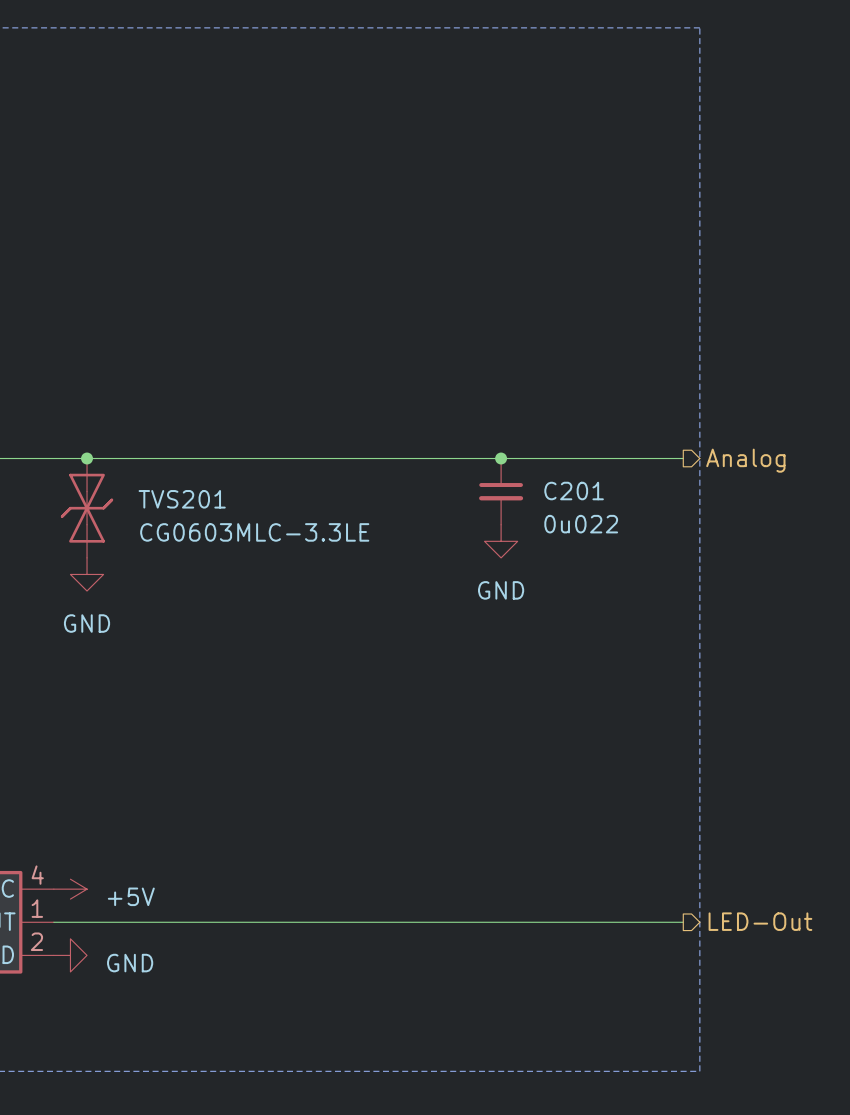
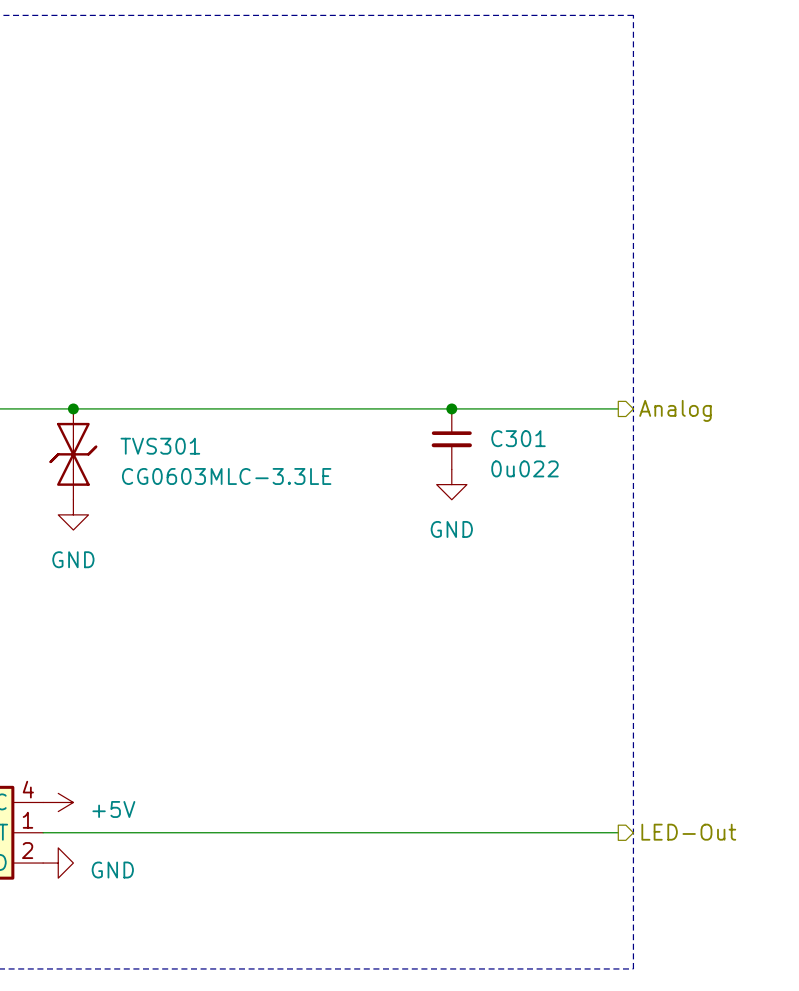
C201 name: C201 (574, 491) -> C301 (518, 438)
TVS201 name: TVS201 (182, 499) -> TVS301 (160, 446)

